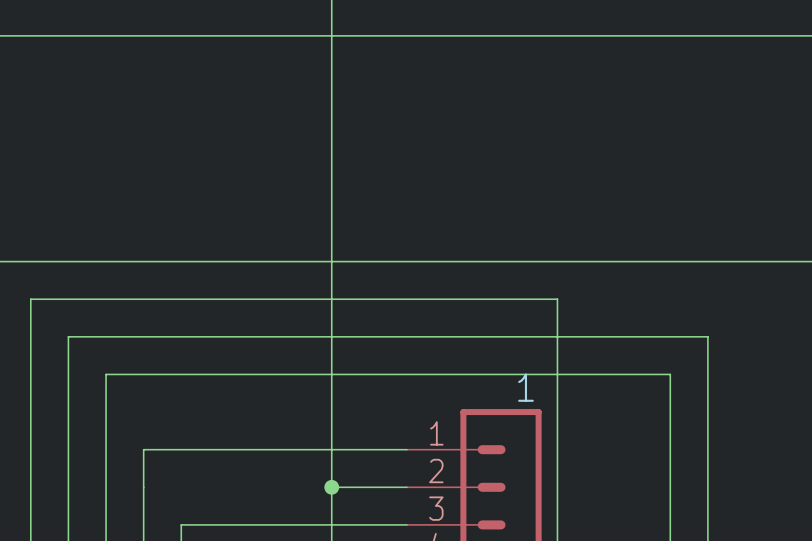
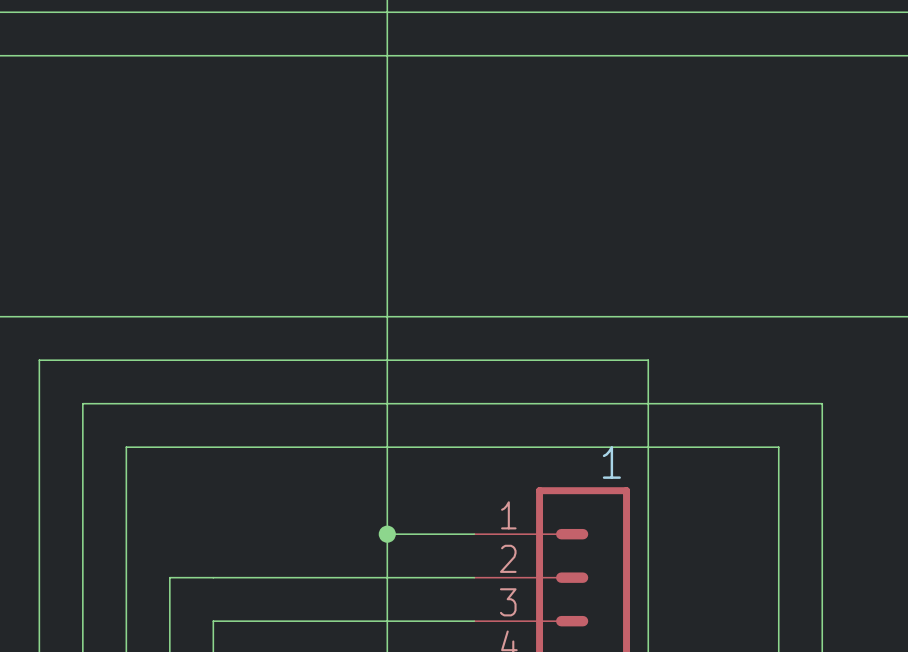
wire: (331, 449) (143, 449) (143, 487) -> (387, 577) (169, 577)
junction position: (331, 487) -> (387, 534)

